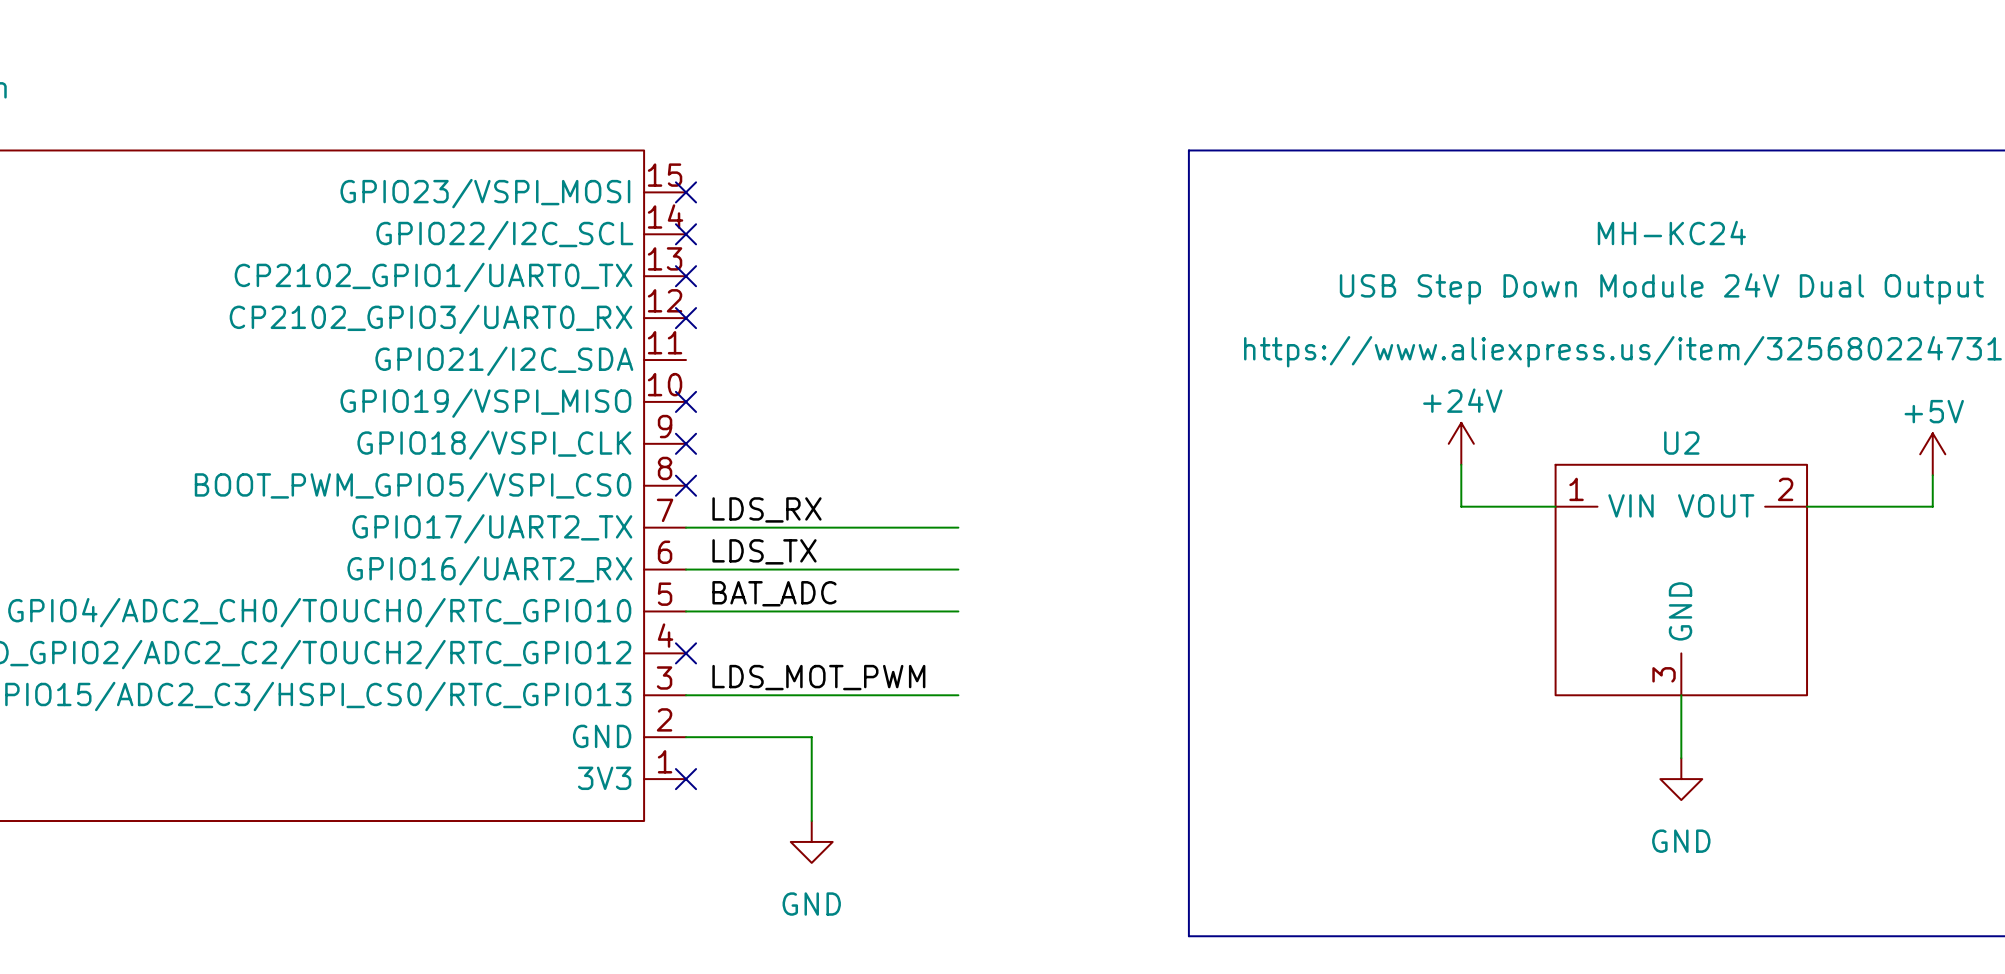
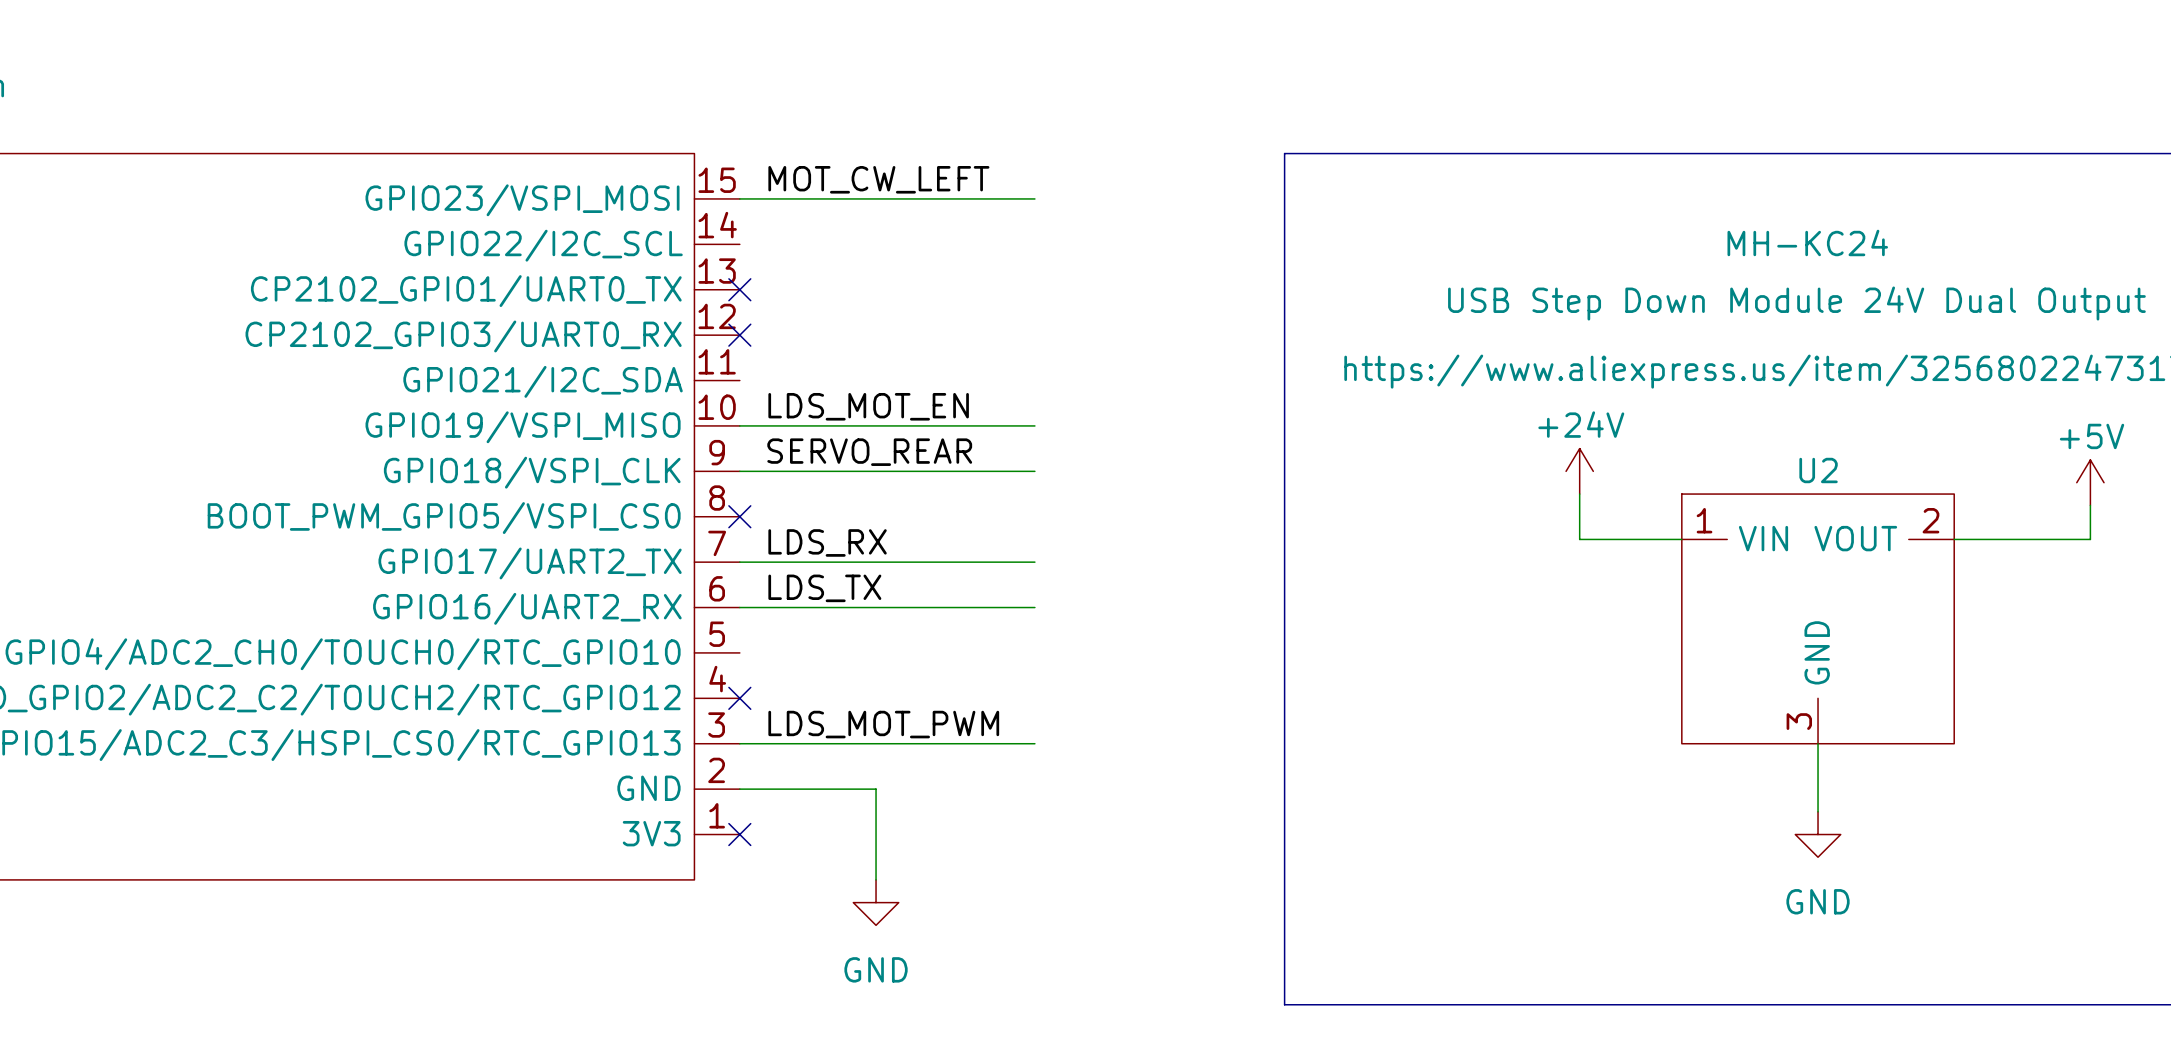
label: none -> MOT_CW_LEFT (878, 179)
wire: none -> (739, 198) (1034, 198)
no-connect mark: (686, 192) -> none
no-connect mark: (686, 234) -> none
label: none -> LDS_MOT_EN (868, 406)
wire: none -> (739, 425) (1034, 425)
no-connect mark: (686, 401) -> none
label: none -> SERVO_REAR (869, 452)
no-connect mark: (686, 443) -> none
label: BAT_ADC (774, 593) -> none
wire: (686, 611) (958, 611) -> (739, 471) (1034, 471)

